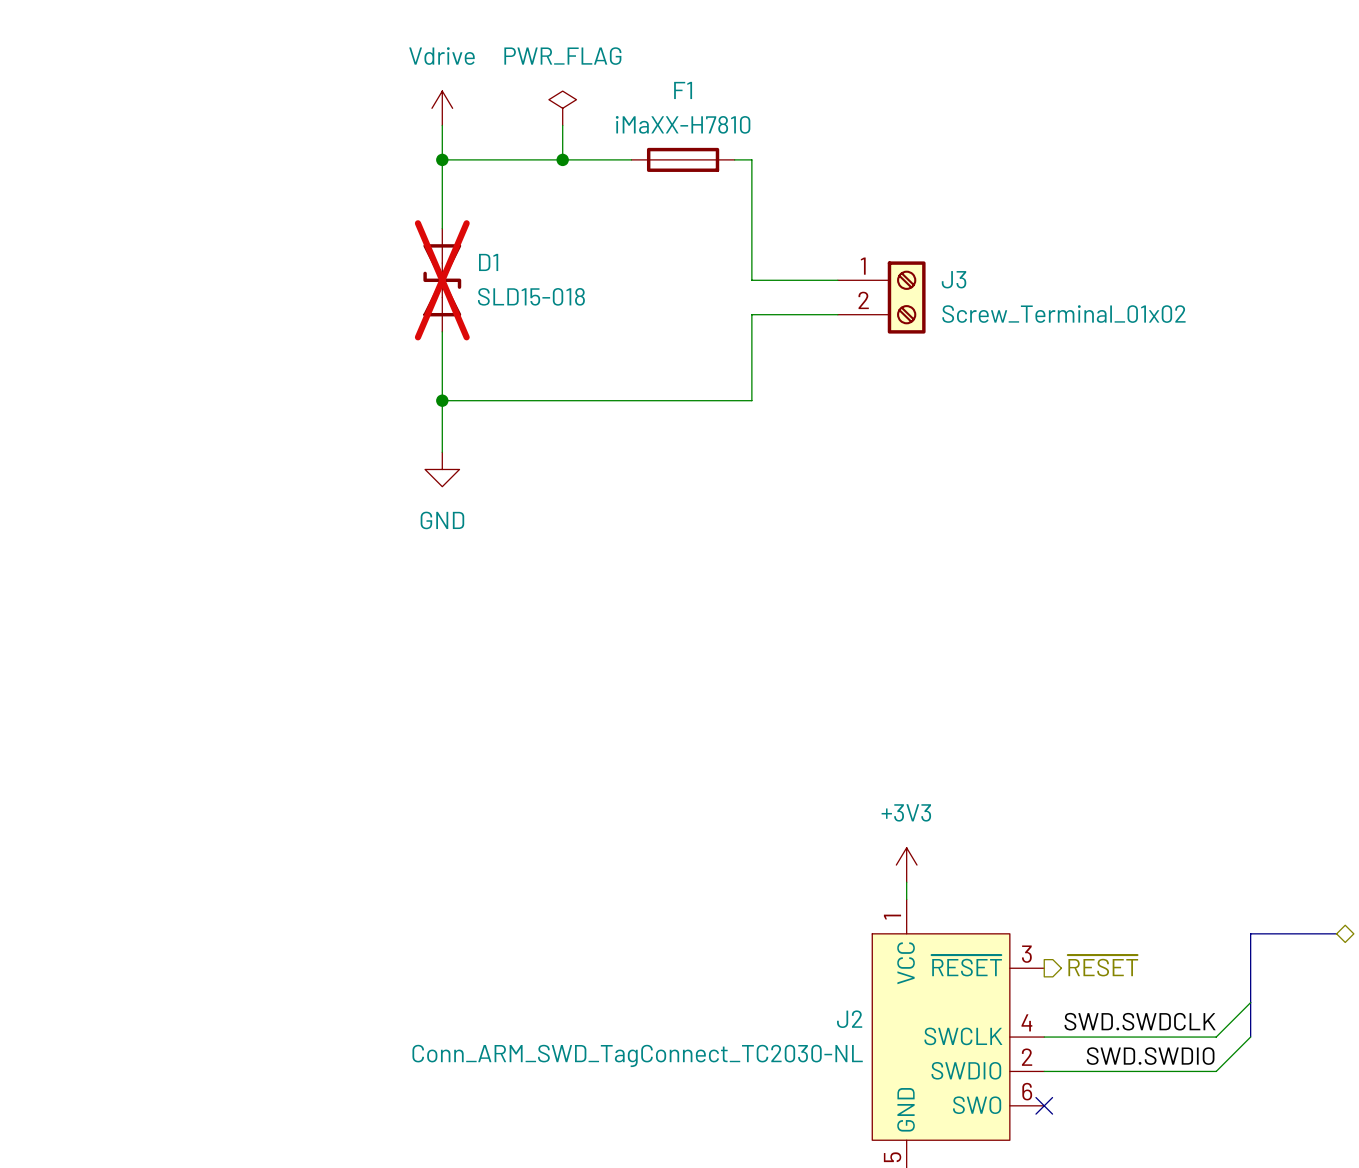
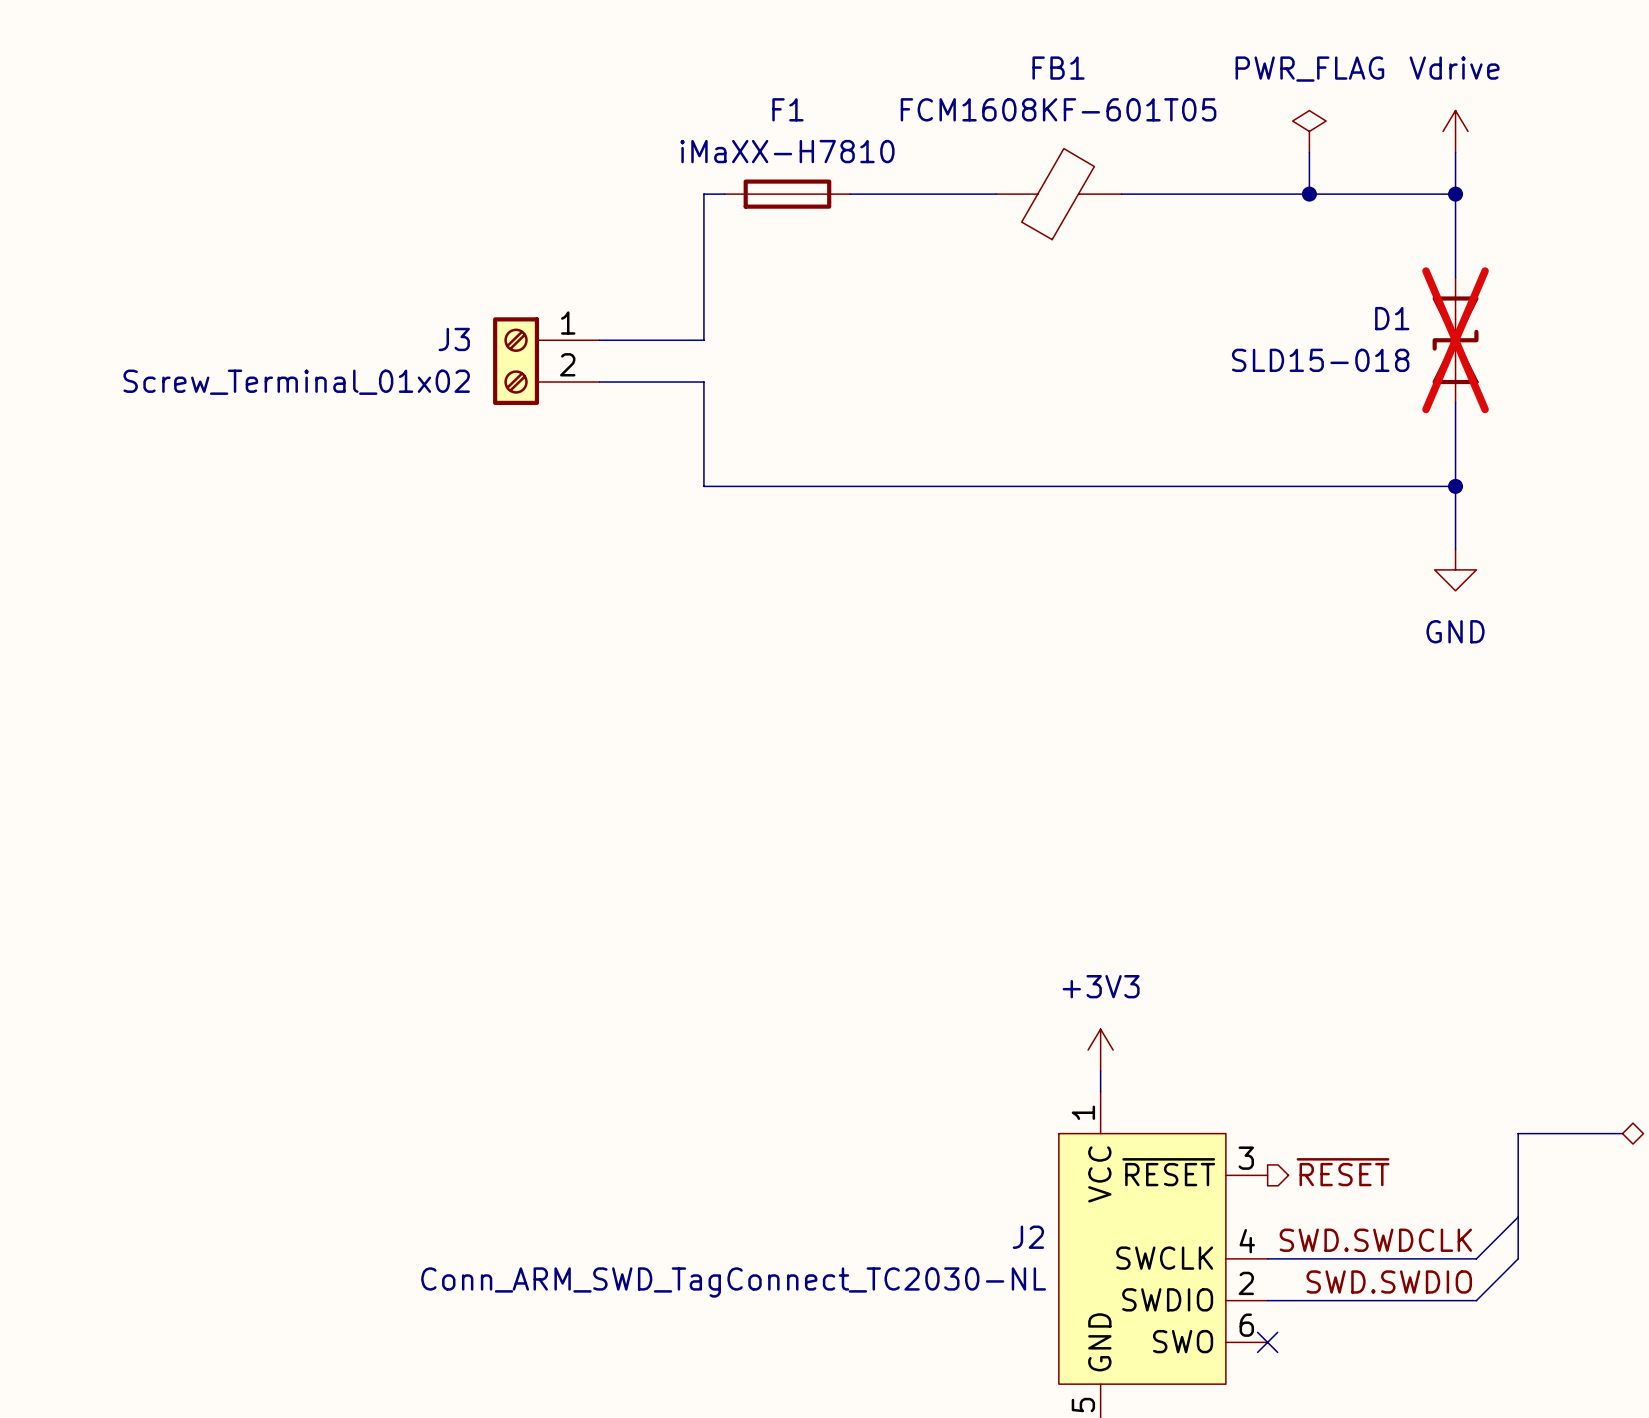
power symbol: Vdrive (442, 108) -> none
power symbol: PWR_FLAG (562, 108) -> none
power symbol: none -> PWR_FLAG (1309, 131)
power symbol: none -> Vdrive (1455, 131)
wire: (442, 125) (442, 228) -> none
wire: (562, 125) (562, 159) -> none
wire: none -> (1309, 152) (1309, 194)
wire: none -> (1455, 152) (1455, 277)
wire: (442, 159) (579, 159) -> (599, 340) (703, 340) (703, 194)
junction: (442, 159) -> none
junction: (562, 159) -> none
F1 position: (683, 159) -> (787, 194)
wire: (751, 159) (751, 280) (837, 280) -> (912, 194) (996, 194)
FB1: none -> FCM1608KF-601T05 (1058, 194)
wire: none -> (1121, 194) (1455, 194)
junction: none -> (1309, 194)
junction: none -> (1455, 194)
D1 flip: as is (442, 280) -> left-right (1455, 340)
D1 position: (442, 280) -> (1455, 340)
J3 position: (881, 297) -> (546, 361)
J3 flip: as is (906, 297) -> left-right (516, 361)
wire: (837, 314) (751, 314) (751, 400) -> (1455, 486) (912, 486)
wire: (442, 331) (442, 452) -> none
wire: none -> (1455, 402) (1455, 549)
wire: (442, 400) (579, 400) -> (599, 382) (703, 382) (703, 486)
junction: (442, 400) -> none
junction: none -> (1455, 486)
power symbol: GND (442, 469) -> none
power symbol: none -> GND (1455, 569)

